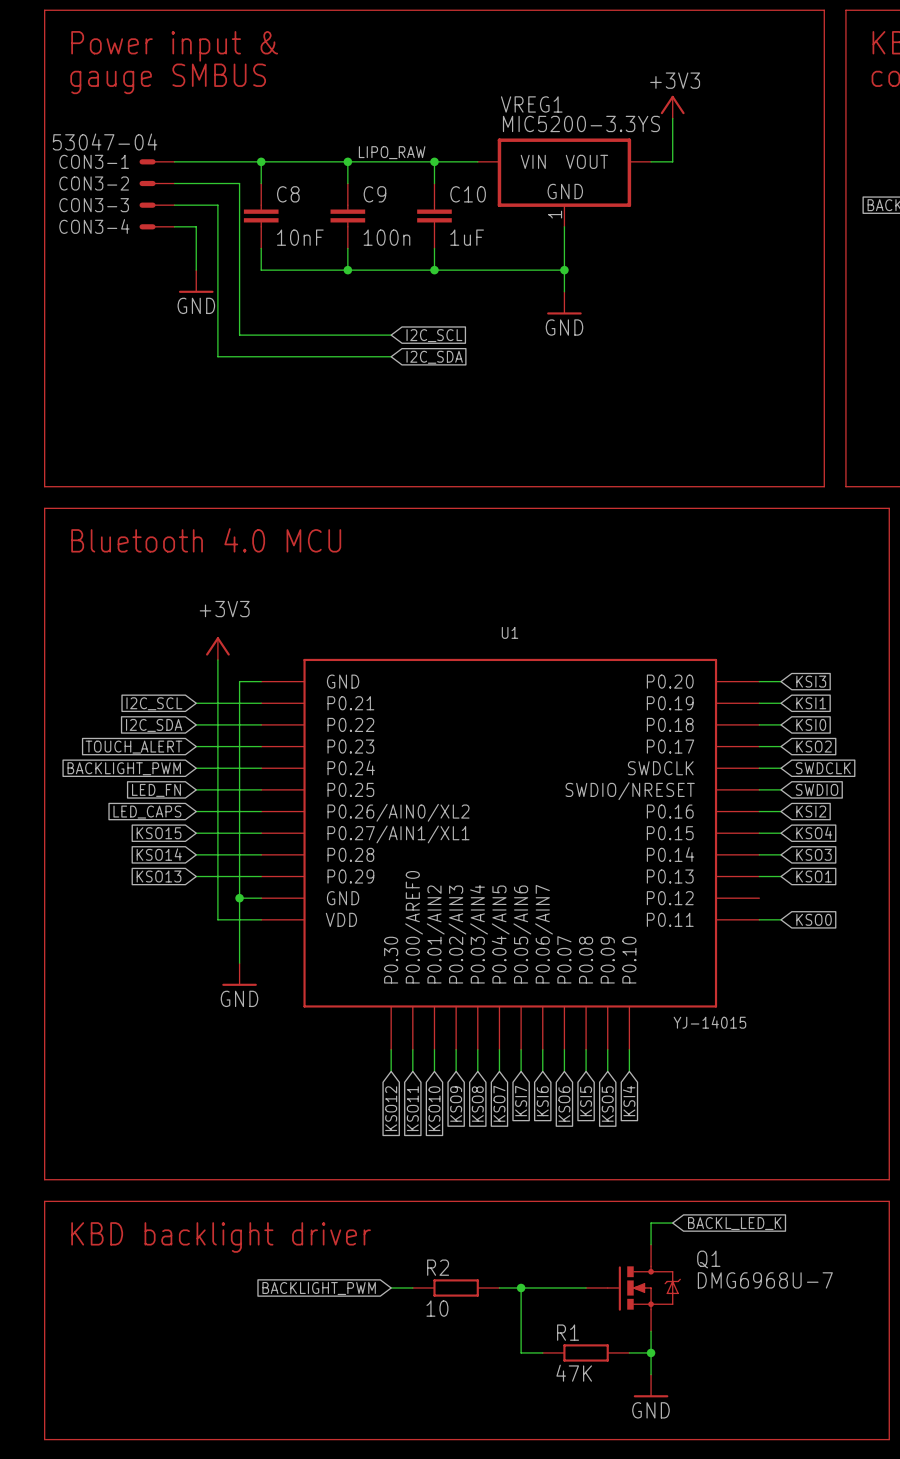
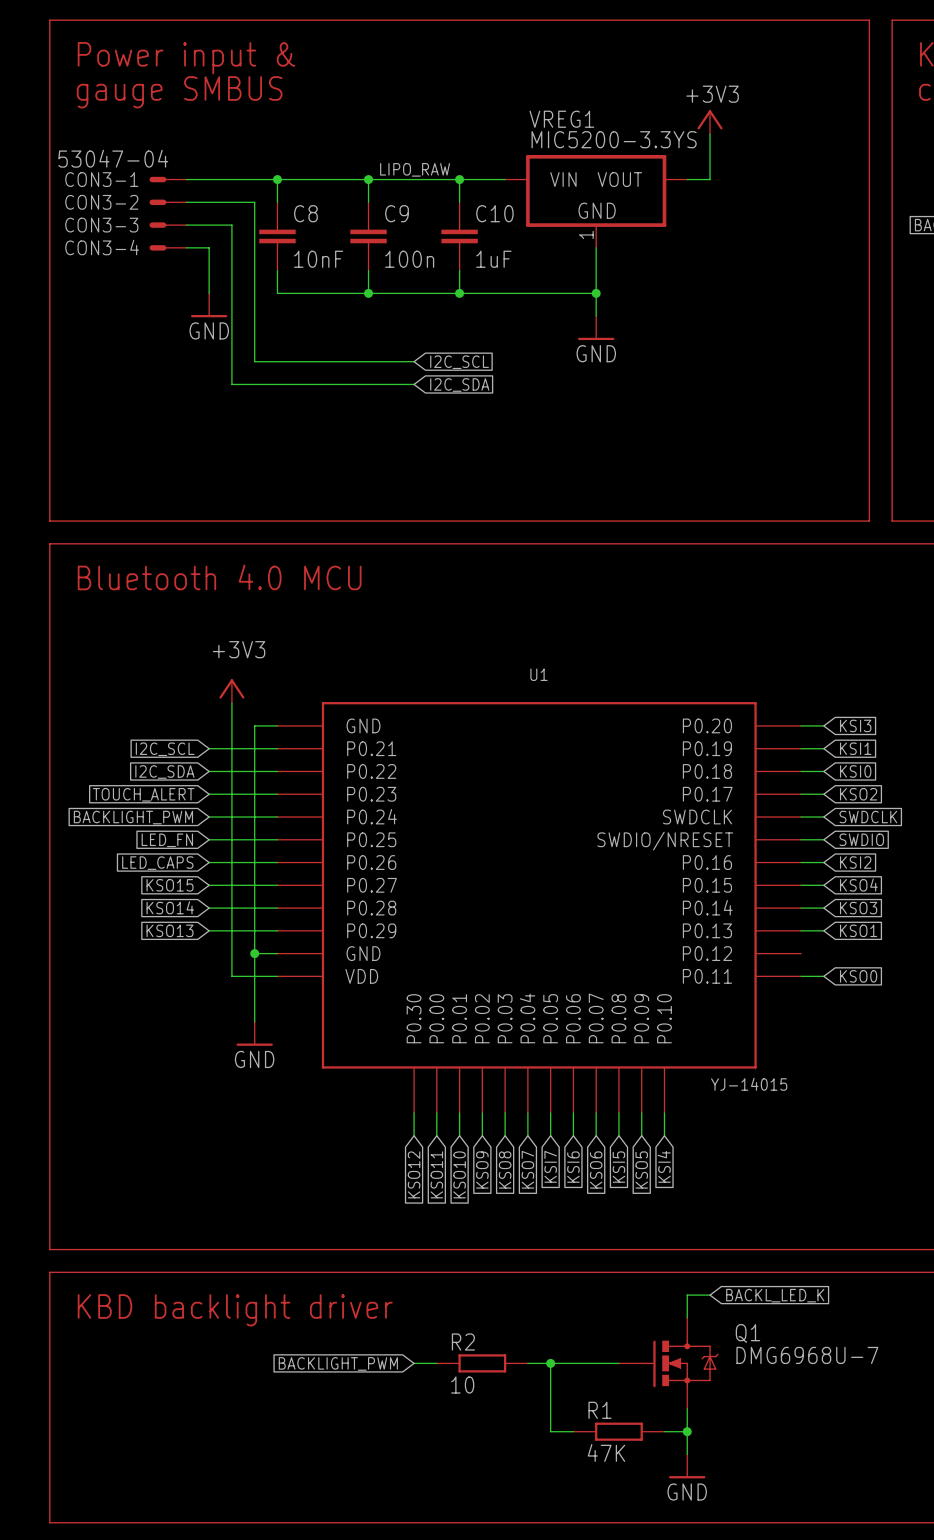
U1 symbol: [261, 658, 760, 1050] -> [277, 702, 802, 1113]

